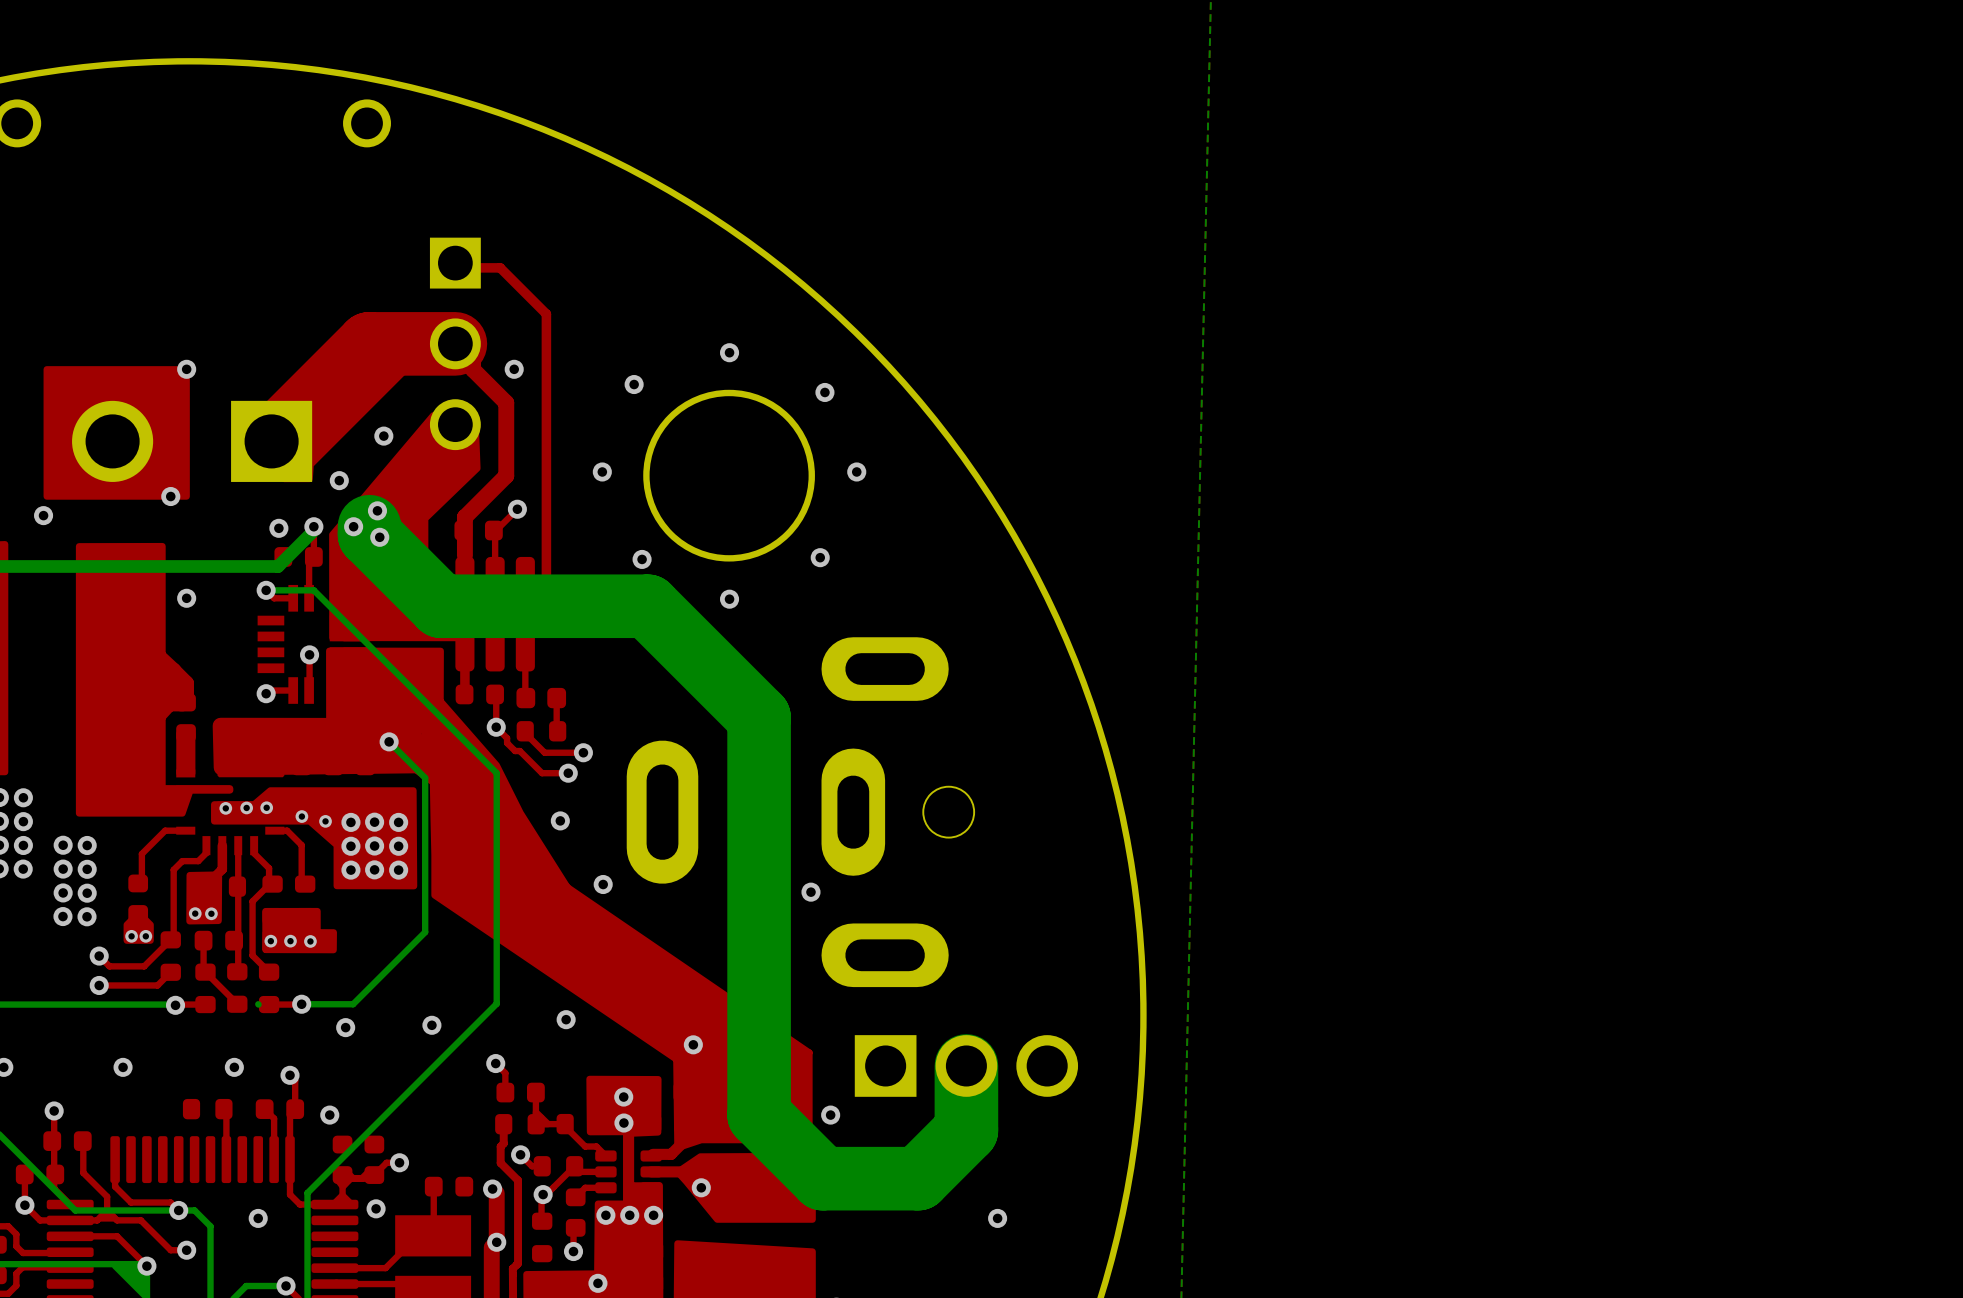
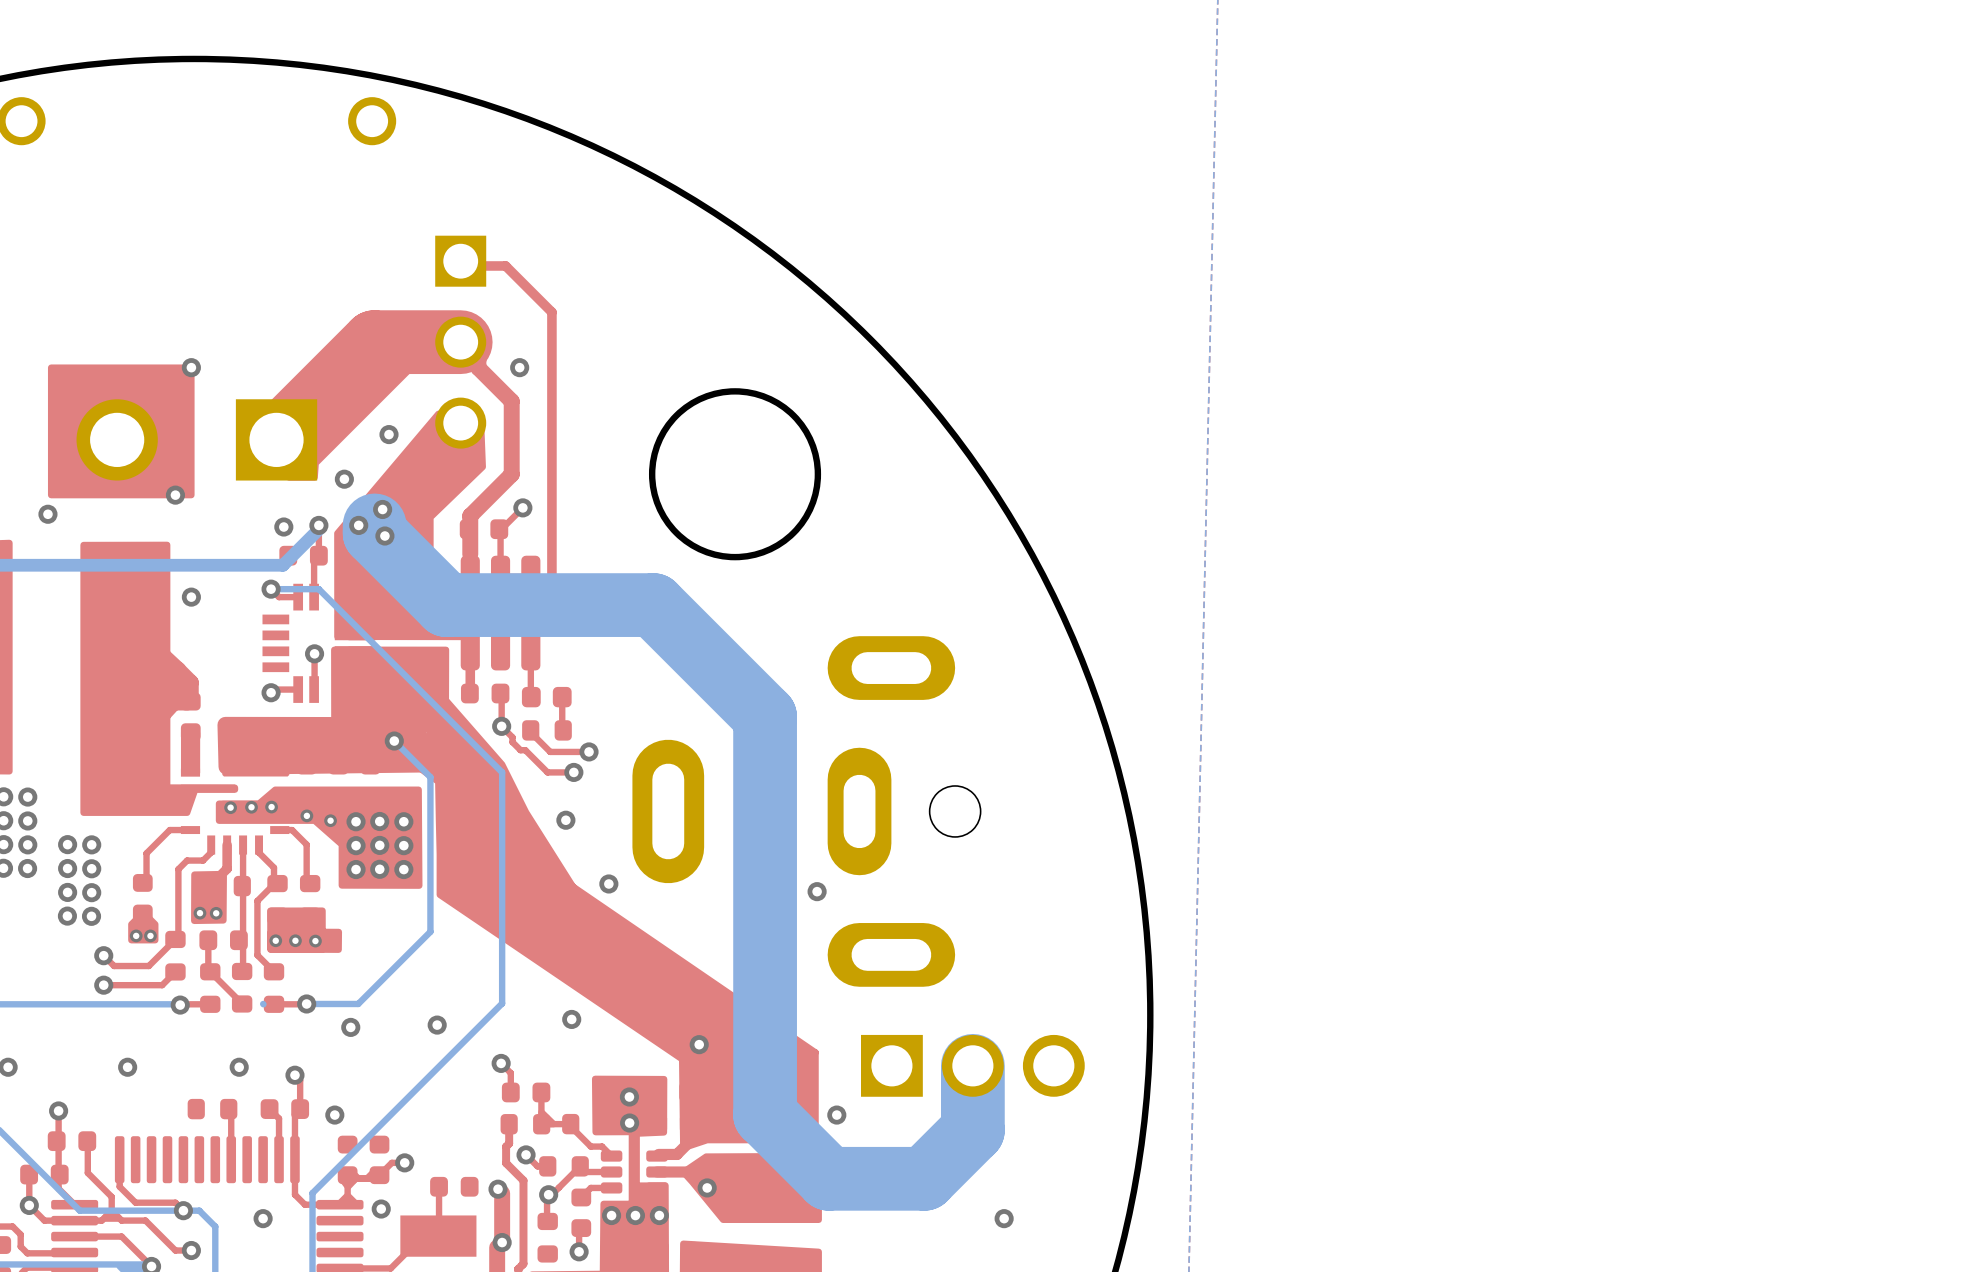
via: (729, 352) -> none
via: (634, 384) -> none
via: (824, 392) -> none
via: (602, 471) -> none
via: (856, 471) -> none
via: (820, 557) -> none
via: (642, 559) -> none
via: (729, 599) -> none

